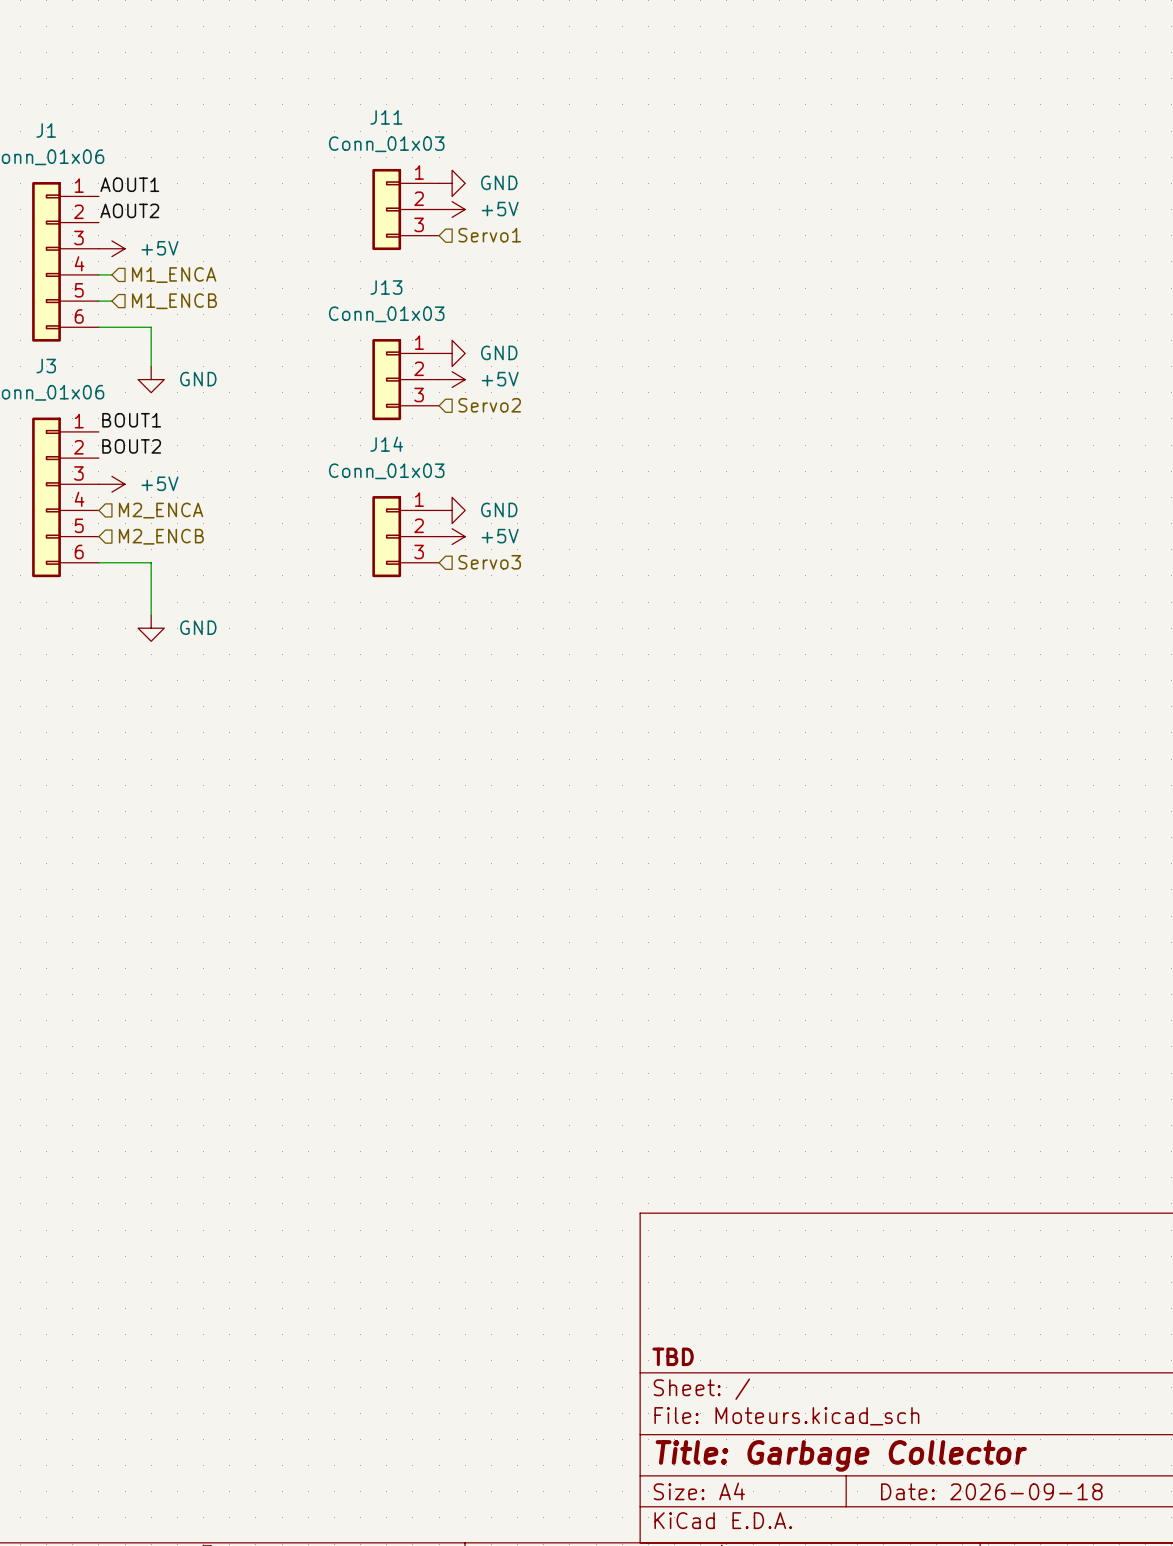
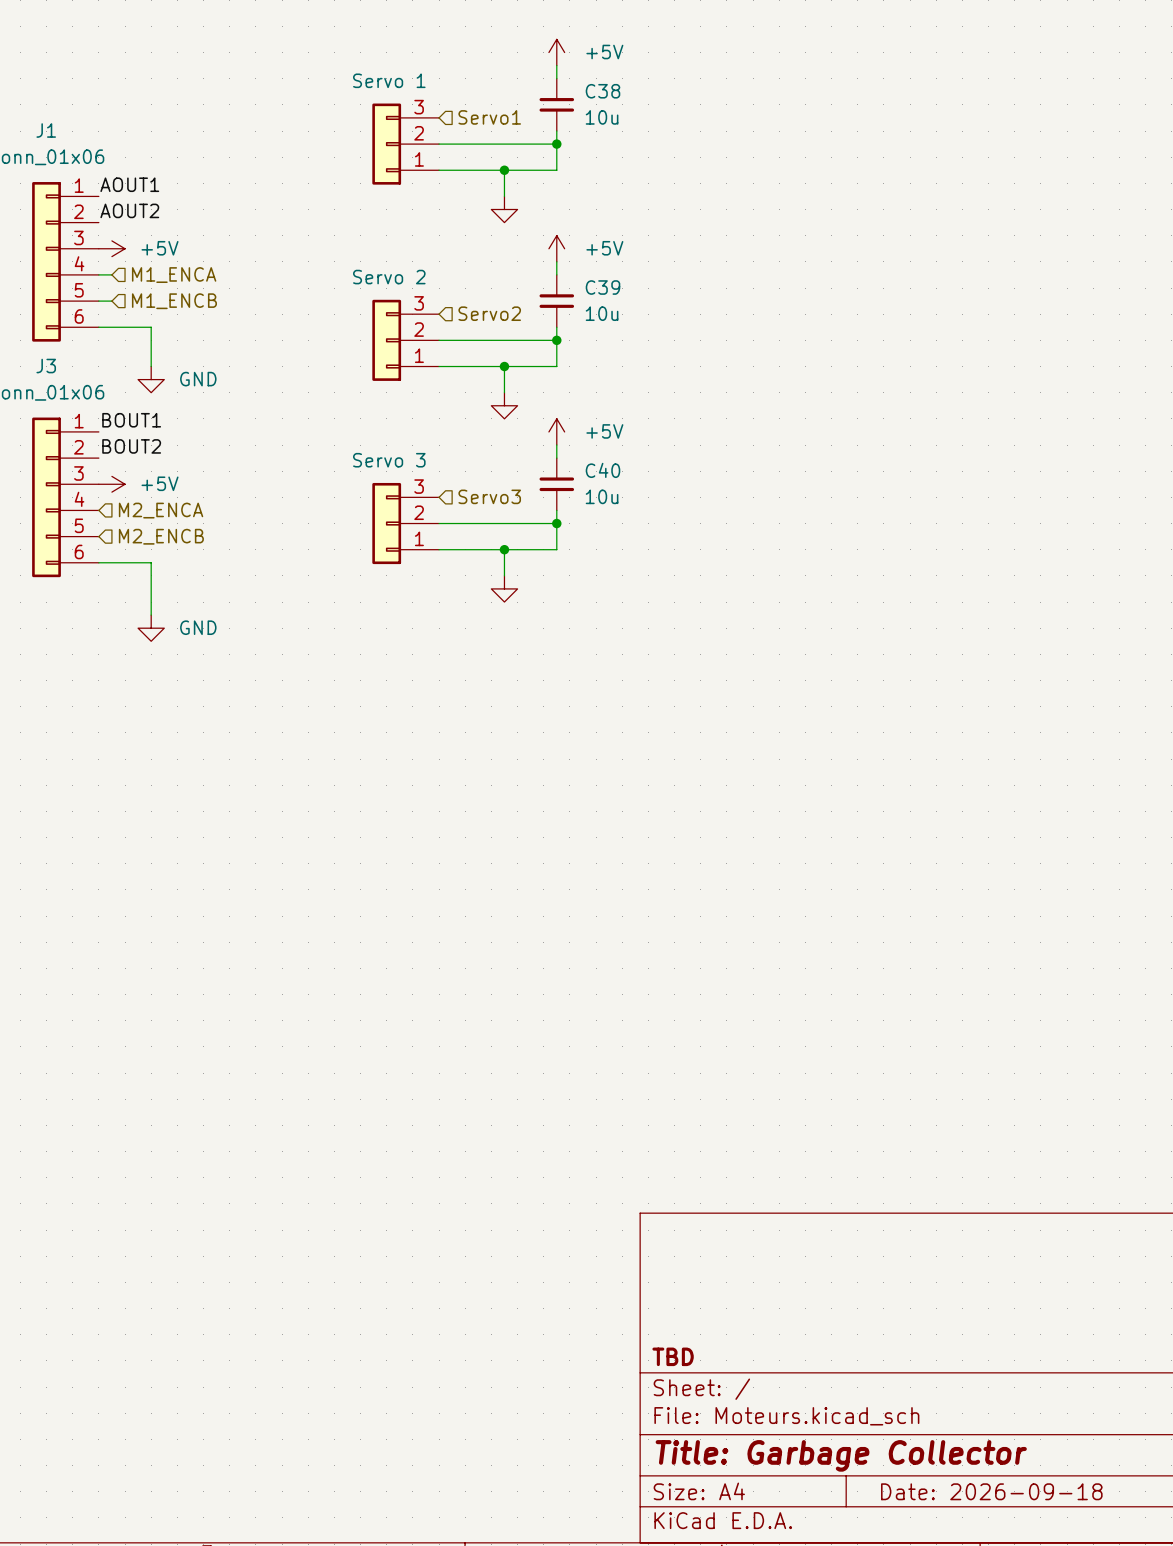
power symbol: none -> +5V (556, 52)
wire: none -> (556, 65) (556, 78)
C38: none -> 10u (556, 104)
wire: none -> (556, 131) (556, 170) (439, 170)
part: none -> Servo 1 (405, 144)
wire: none -> (439, 144) (556, 144)
junction: none -> (556, 144)
wire: none -> (504, 170) (504, 196)
junction: none -> (504, 170)
power symbol: GND (452, 183) -> none
J11: Conn_01x03 (405, 209) -> none
power symbol: +5V (452, 209) -> none
power symbol: none -> (504, 209)
hierarchical label position: Servo1 (489, 235) -> Servo1 (489, 117)
power symbol: none -> +5V (556, 248)
wire: none -> (556, 261) (556, 274)
C39: none -> 10u (556, 301)
wire: none -> (556, 327) (556, 366) (439, 366)
part: none -> Servo 2 (405, 340)
wire: none -> (439, 340) (556, 340)
junction: none -> (556, 340)
power symbol: GND (452, 353) -> none
wire: none -> (504, 366) (504, 392)
junction: none -> (504, 366)
J13: Conn_01x03 (405, 379) -> none
power symbol: +5V (452, 379) -> none
hierarchical label position: Servo2 (489, 405) -> Servo2 (489, 313)
power symbol: none -> (504, 405)
power symbol: none -> +5V (556, 431)
wire: none -> (556, 445) (556, 458)
C40: none -> 10u (556, 484)
power symbol: GND (452, 510) -> none
wire: none -> (556, 510) (556, 549) (439, 549)
part: none -> Servo 3 (405, 523)
wire: none -> (439, 523) (556, 523)
junction: none -> (556, 523)
J14: Conn_01x03 (405, 536) -> none
power symbol: +5V (452, 536) -> none
wire: none -> (504, 549) (504, 575)
junction: none -> (504, 549)
hierarchical label position: Servo3 (489, 562) -> Servo3 (489, 496)
power symbol: none -> (504, 588)

